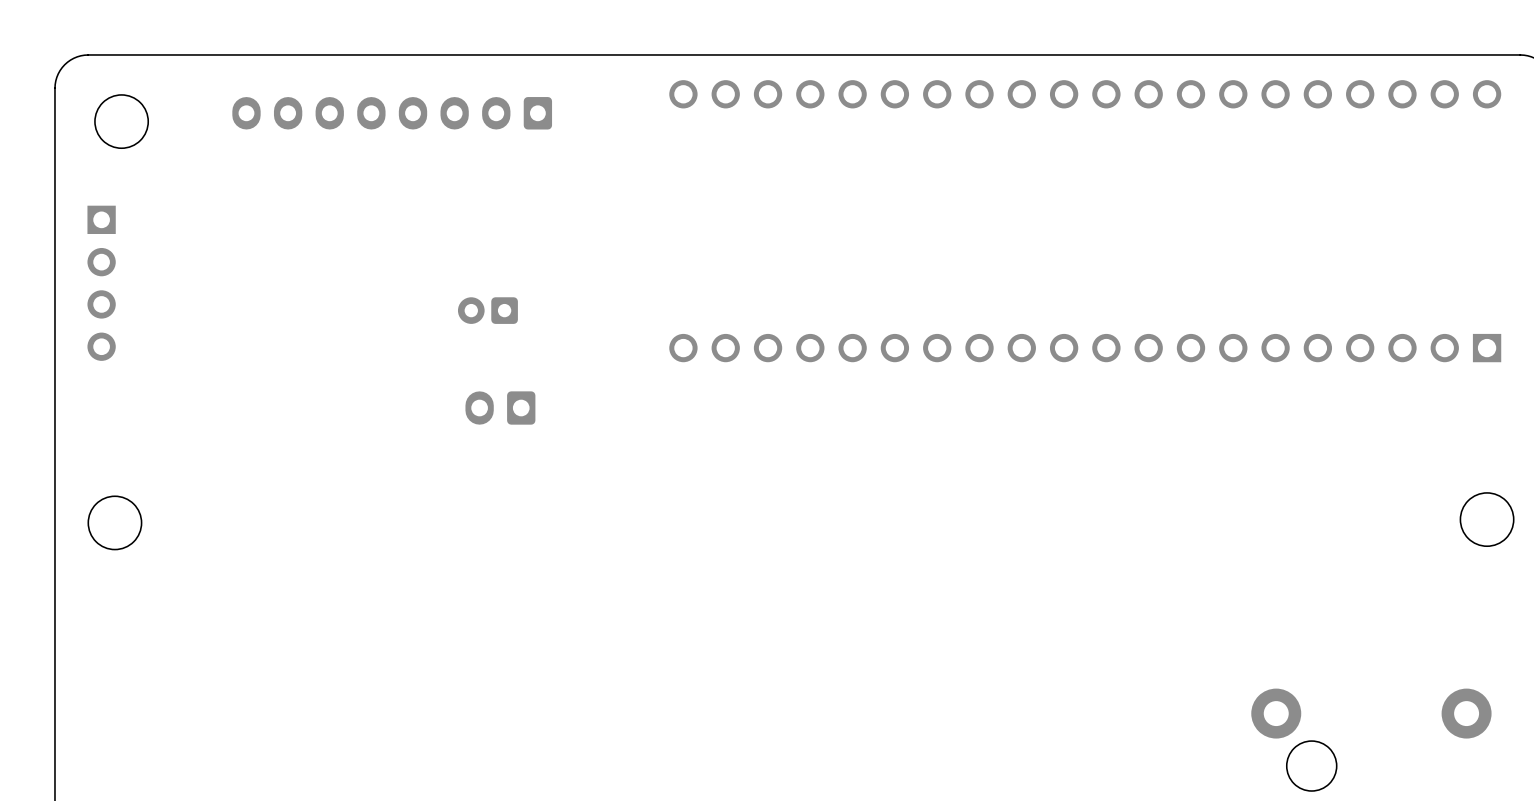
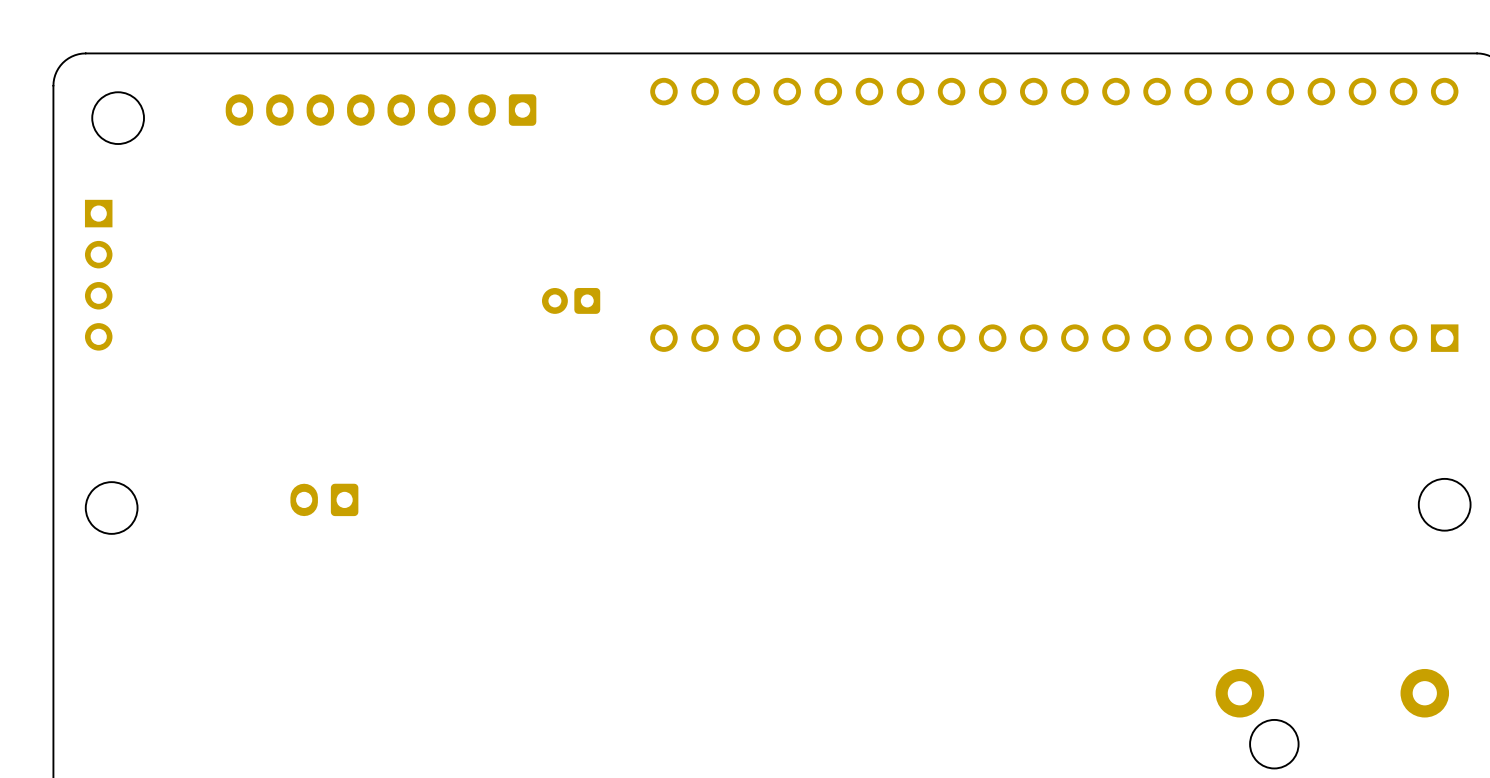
part position: (487, 310) -> (571, 300)
part position: (500, 408) -> (324, 499)

